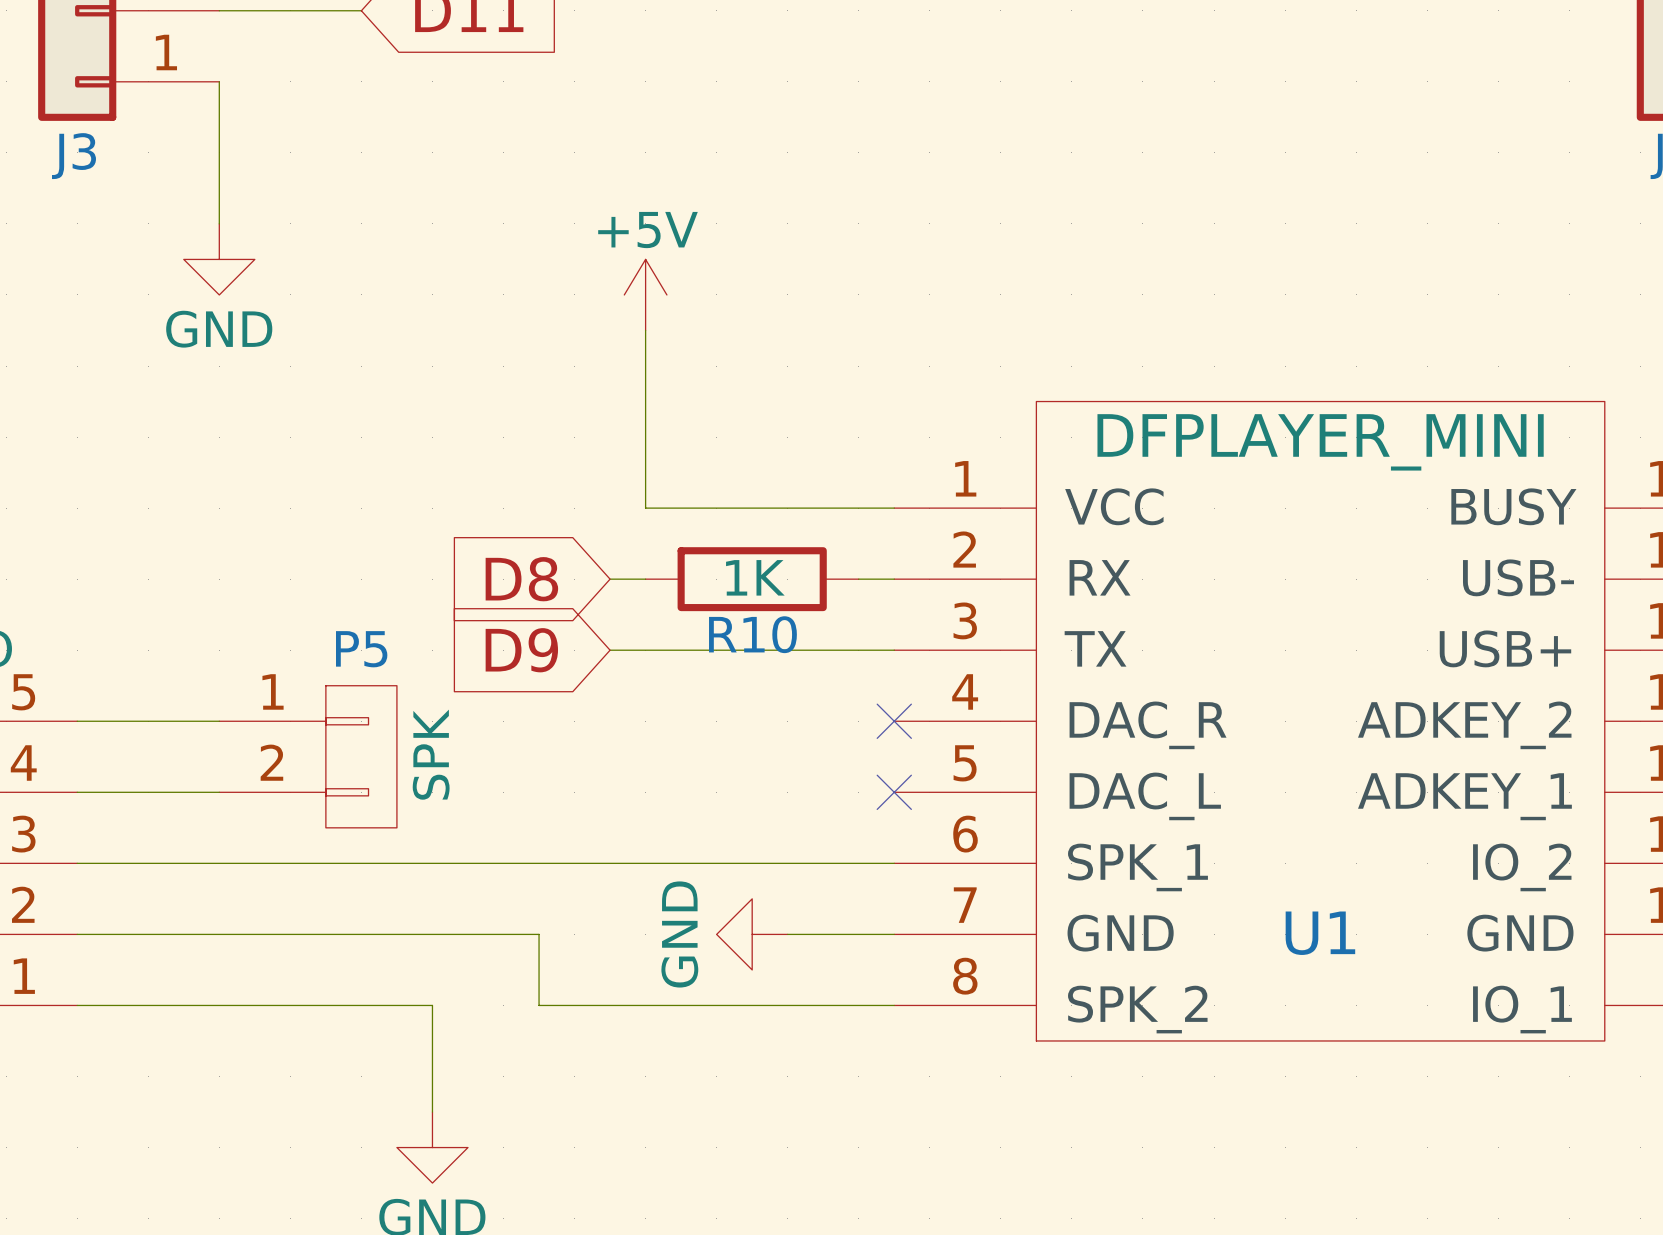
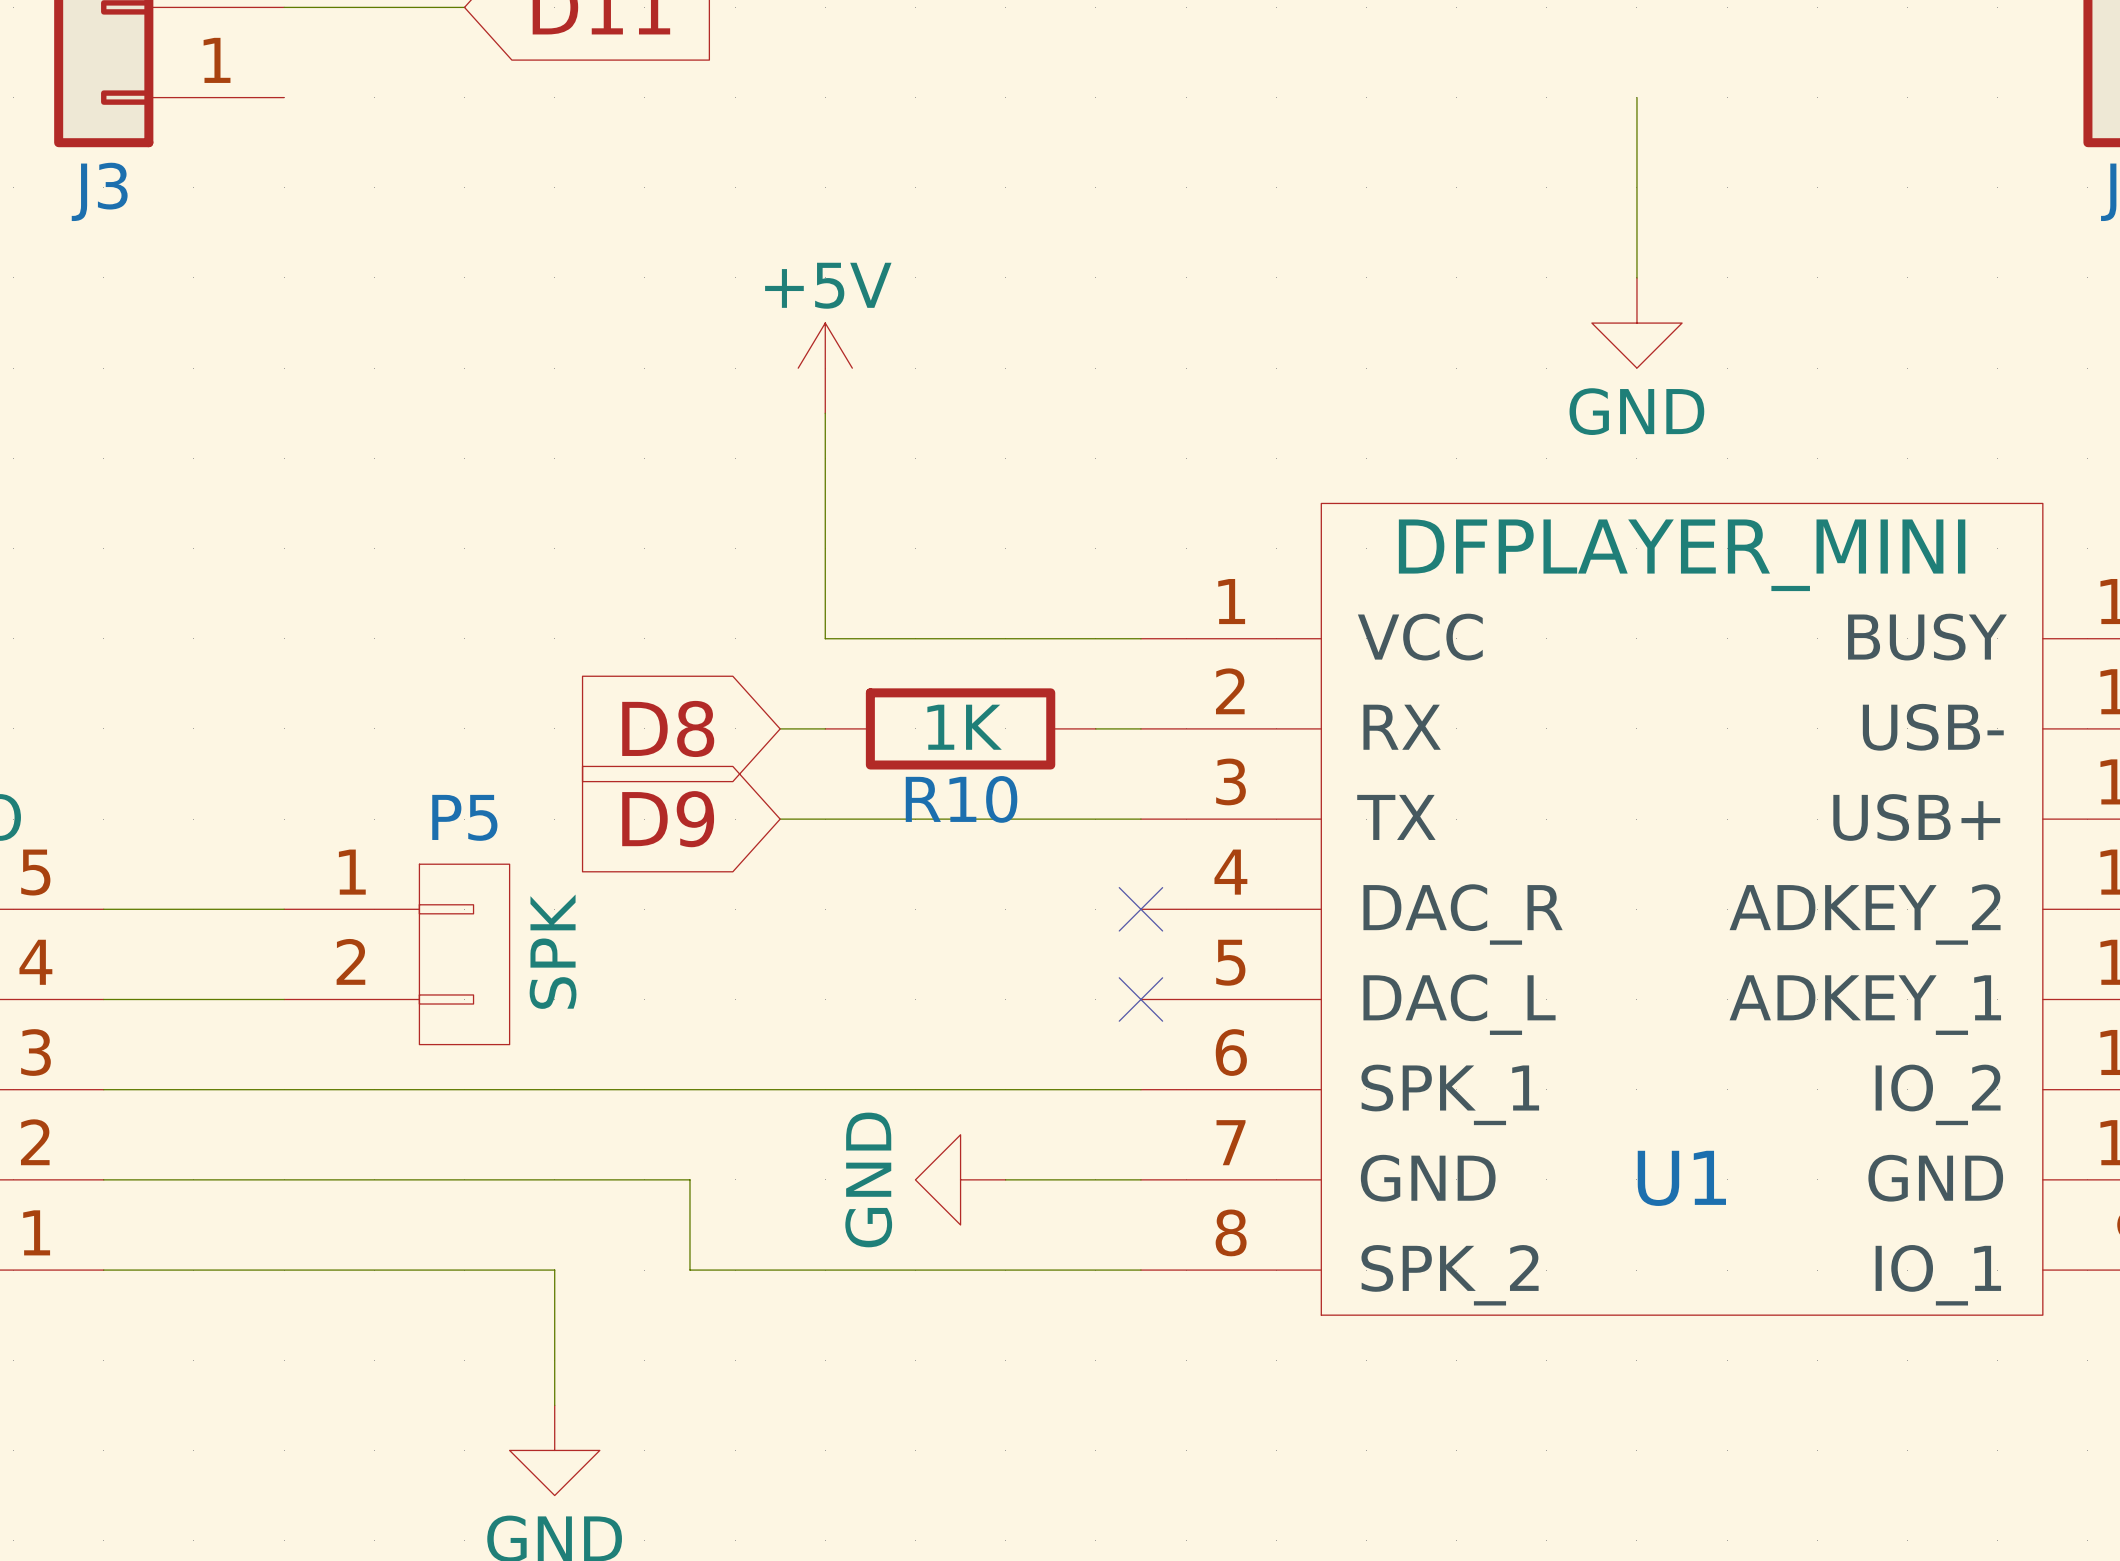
wire: (219, 81) (219, 223) -> none
wire: none -> (1636, 97) (1636, 277)
power symbol: GND (219, 259) -> none
power symbol: none -> GND (1636, 323)

